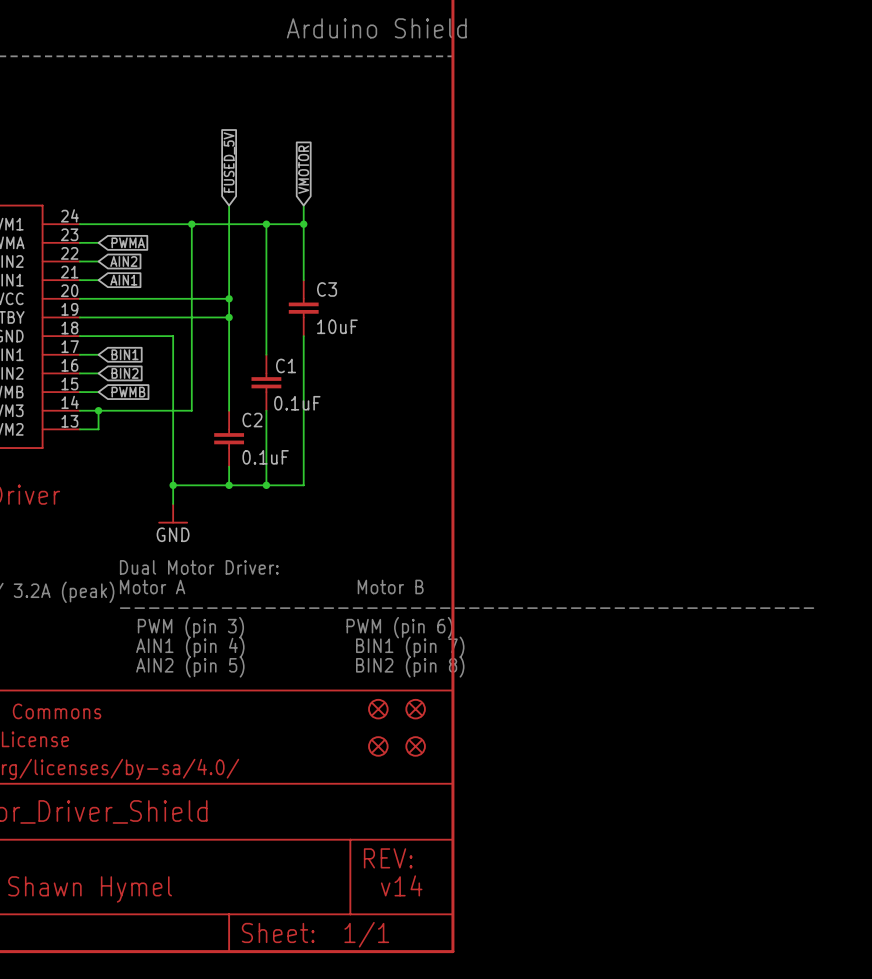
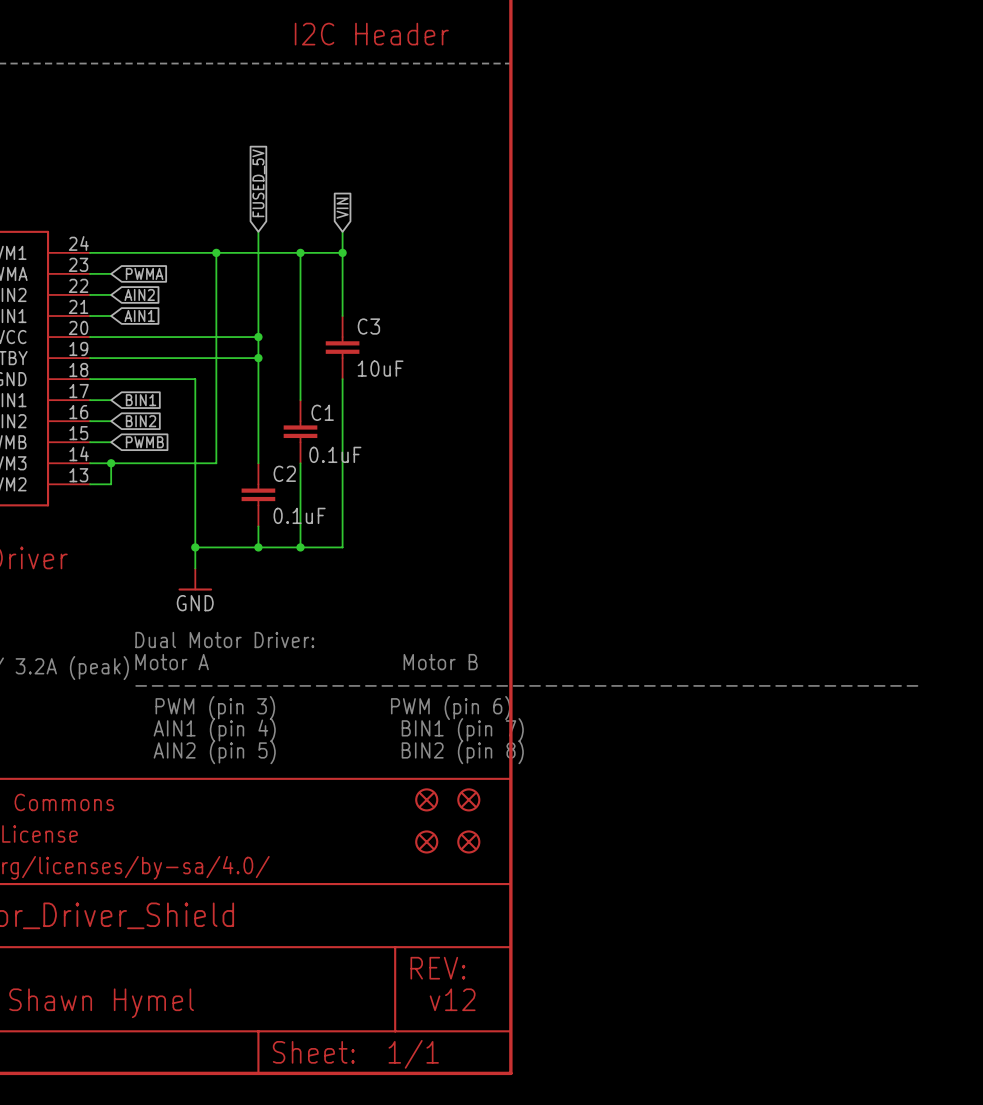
text: Arduino Shield (376, 28) -> none
text: none -> I2C Header (371, 34)
global label: VMOTOR (303, 169) -> VIN (342, 208)
text: v14 (401, 885) -> v12 (452, 999)

